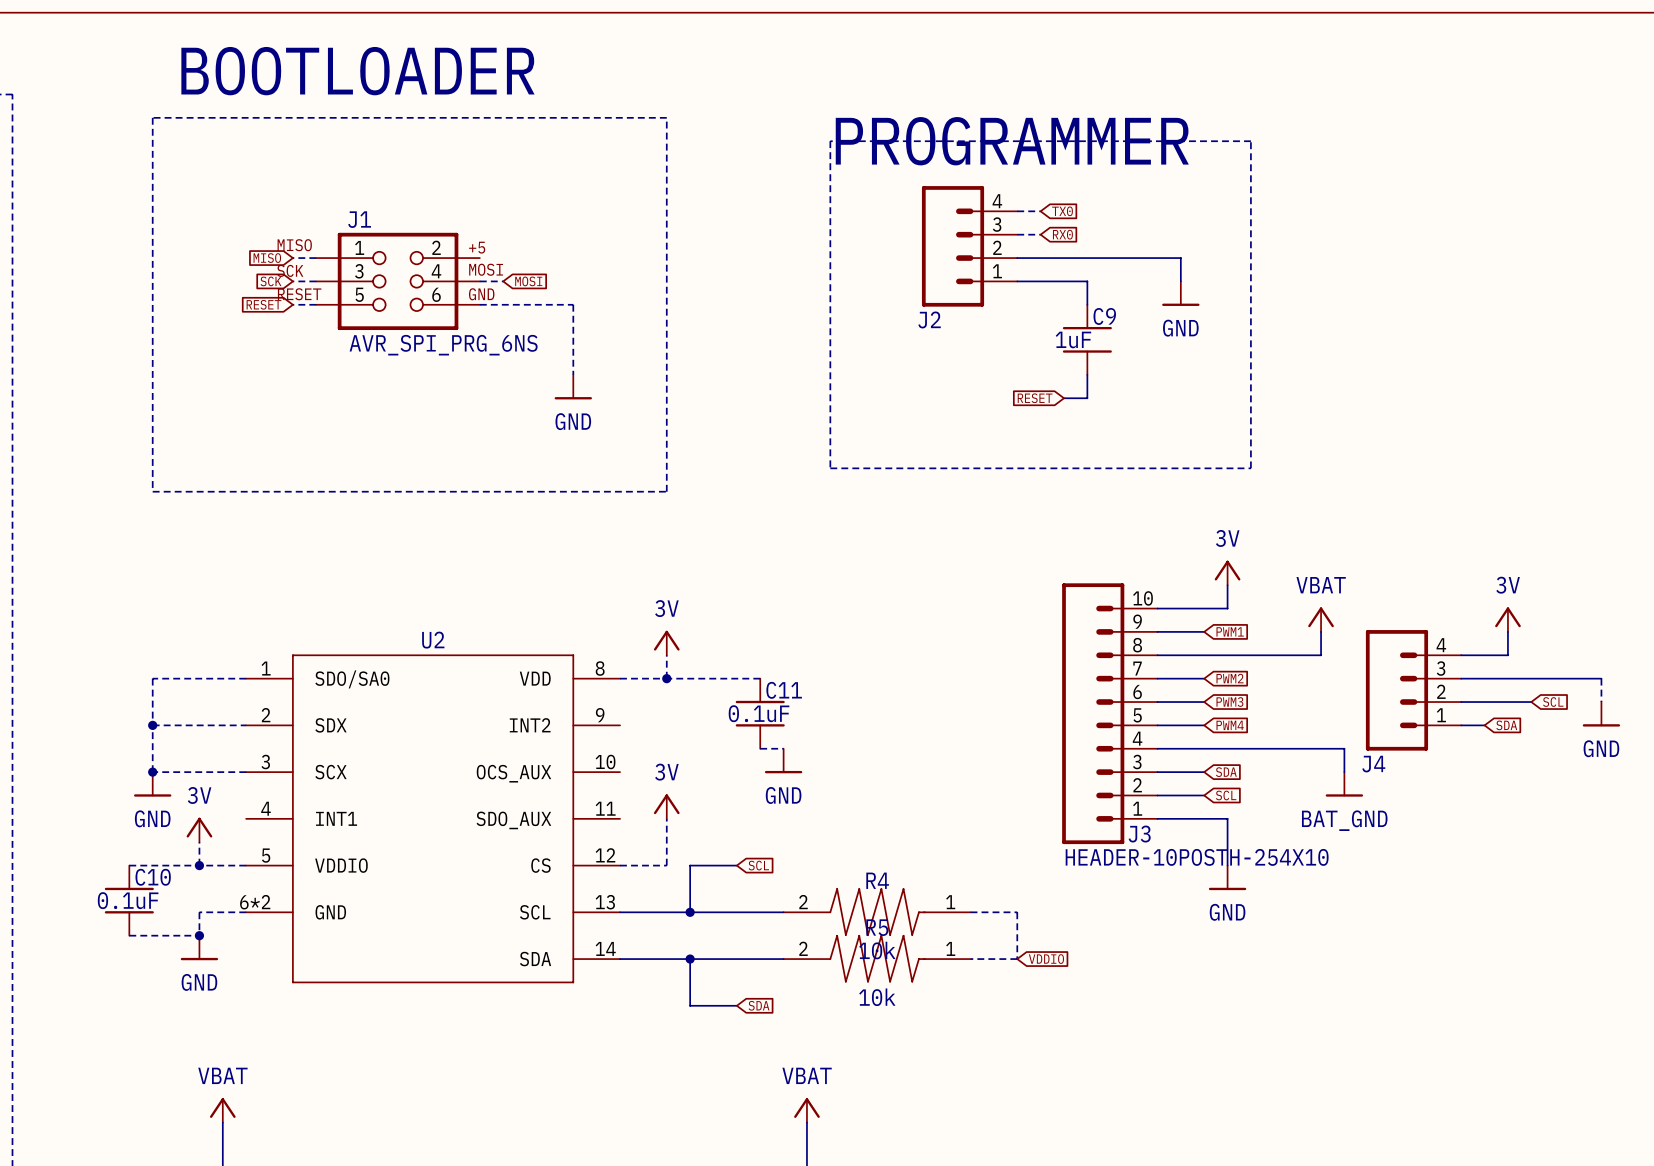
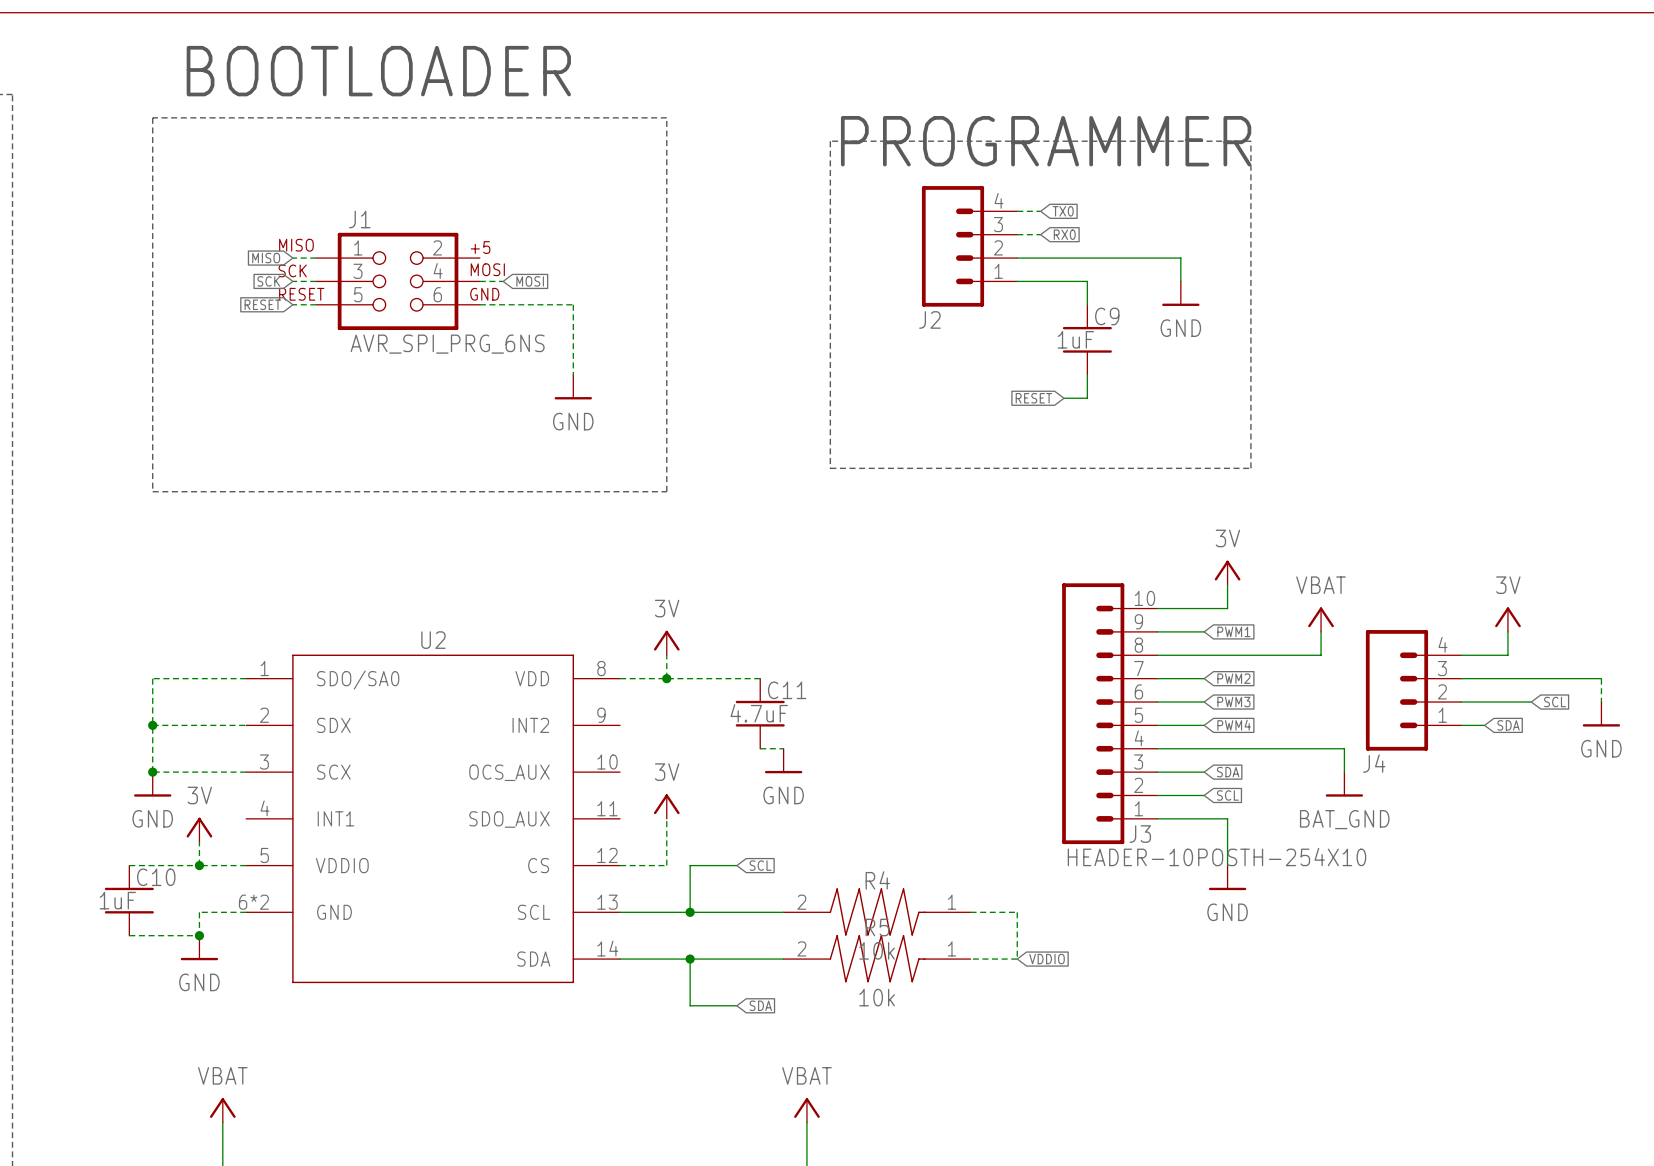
C11 value: 0.1uF (759, 713) -> 4.7uF (759, 713)
C10 value: 0.1uF (128, 900) -> 1uF (117, 900)

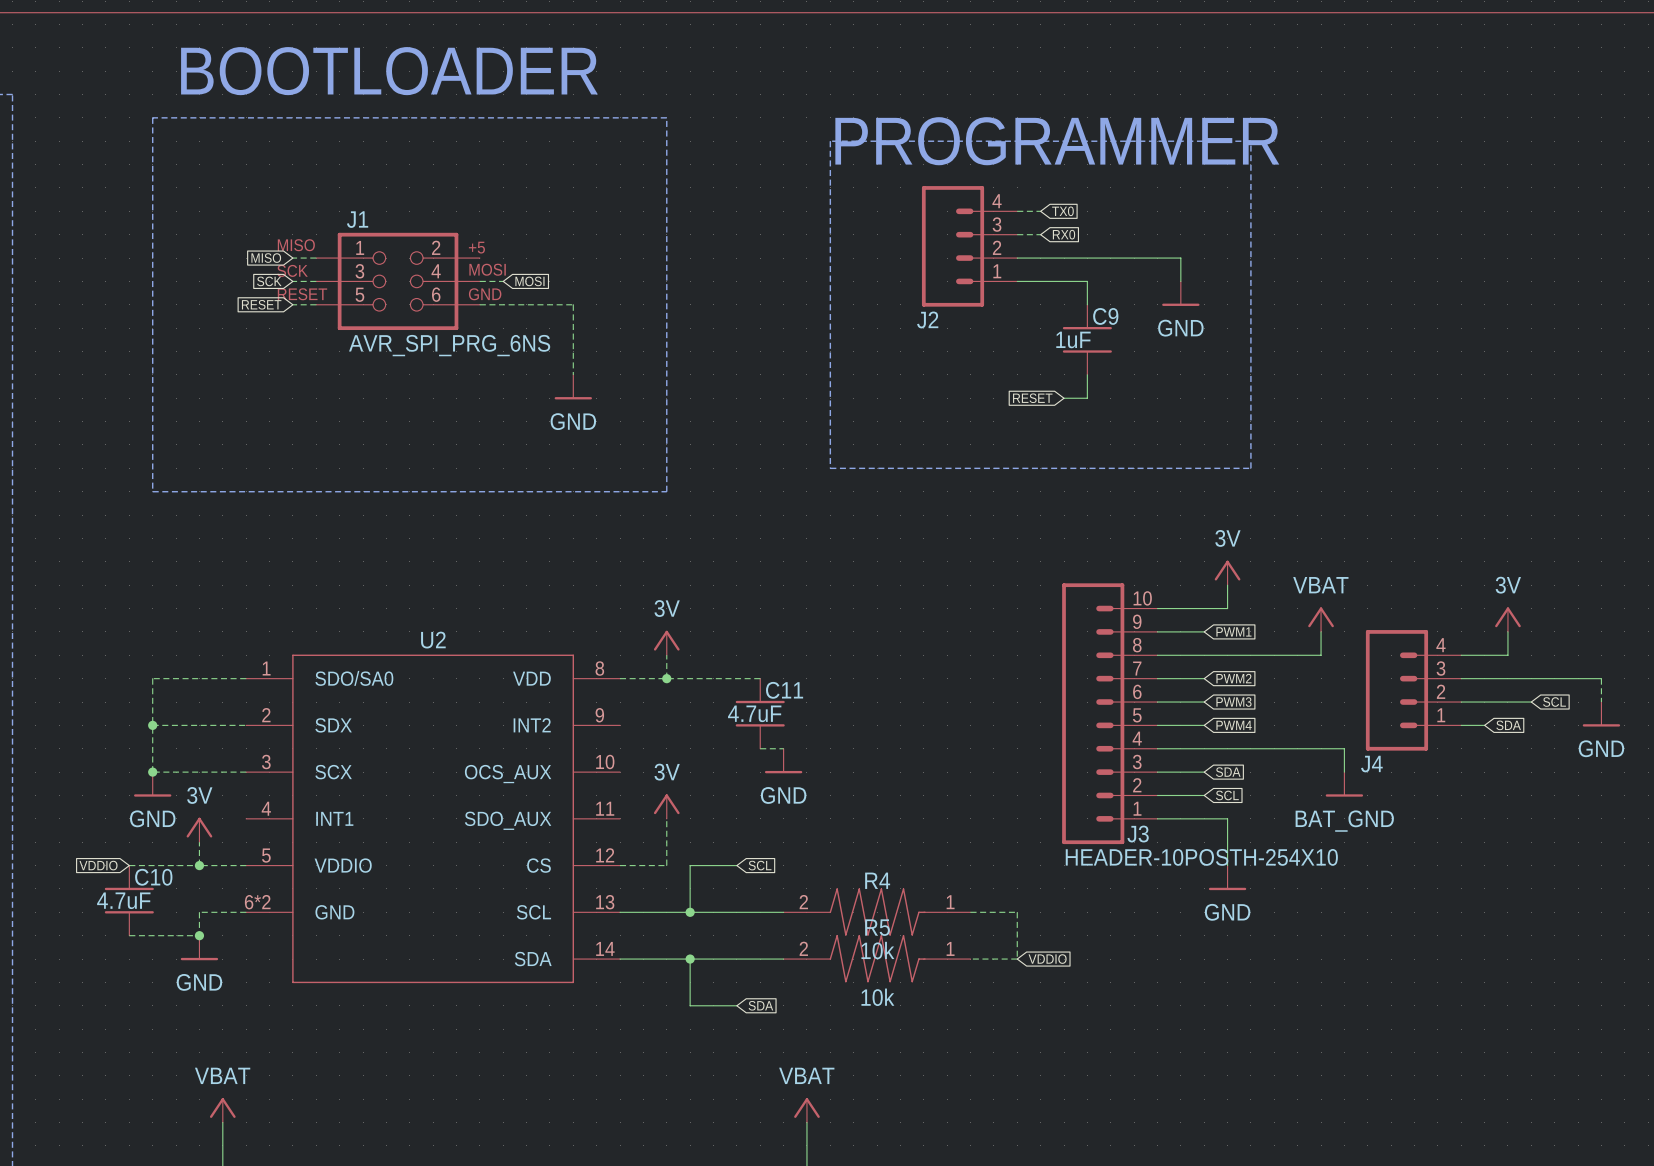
global label: none -> VDDIO (98, 865)
C10 value: 1uF (117, 900) -> 4.7uF (123, 900)

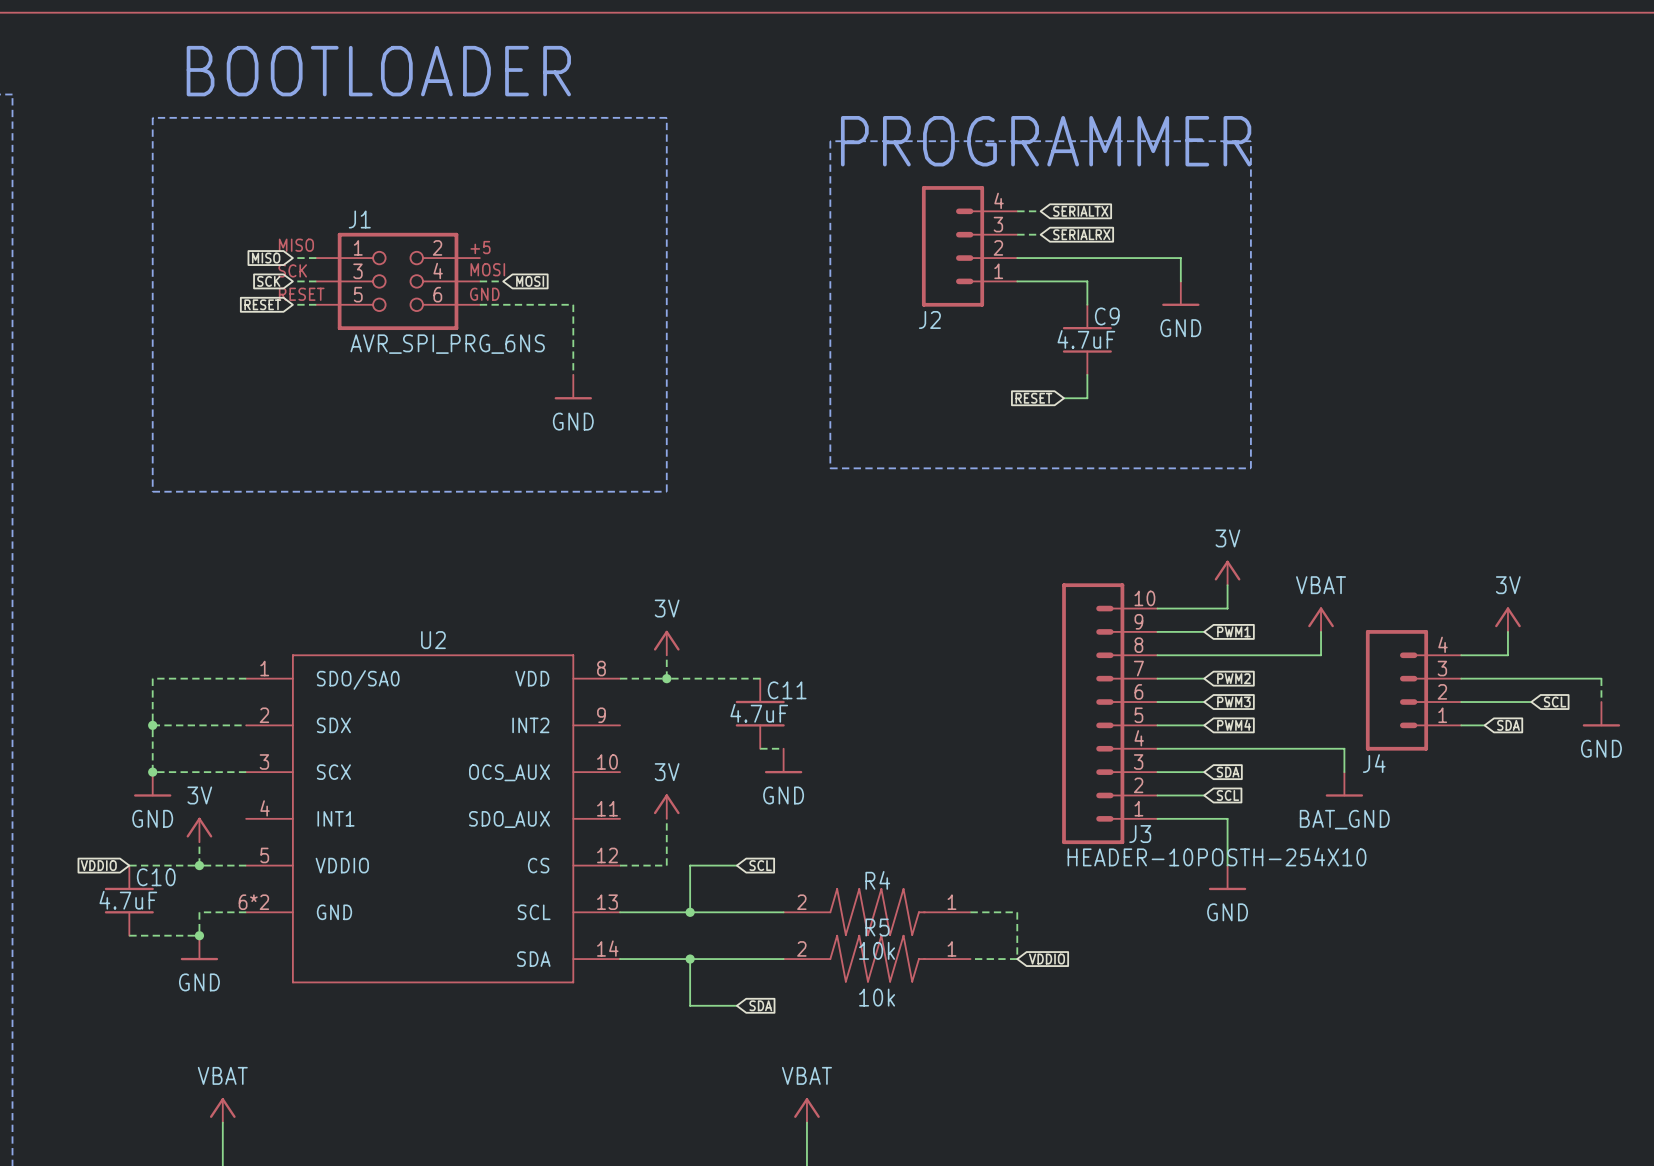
global label: TX0 (1062, 211) -> SERIALTX (1080, 211)
global label: RX0 (1064, 234) -> SERIALRX (1081, 234)
C9 value: 1uF (1073, 339) -> 4.7uF (1086, 339)

